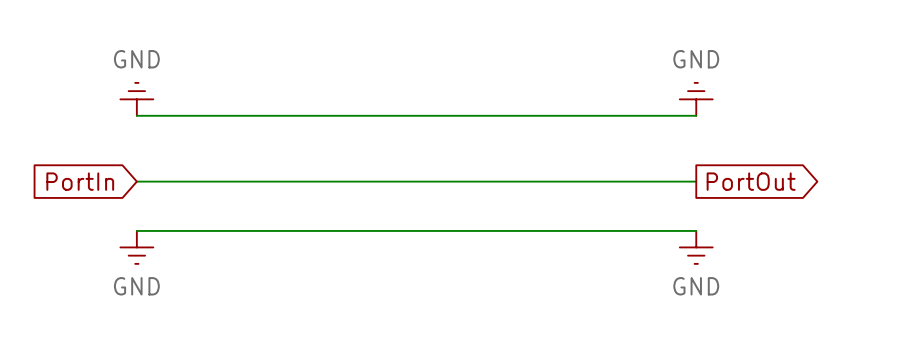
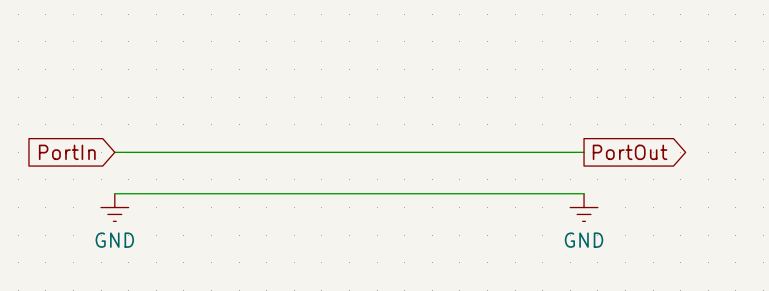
power symbol: GND (136, 99) -> none
power symbol: GND (696, 99) -> none
wire: (136, 115) (696, 115) -> none

